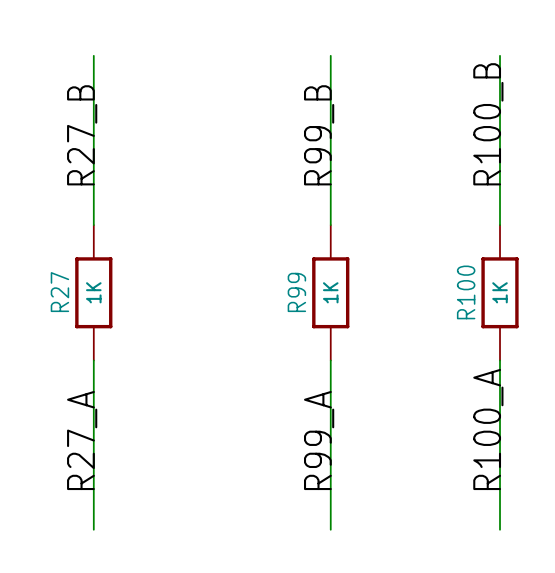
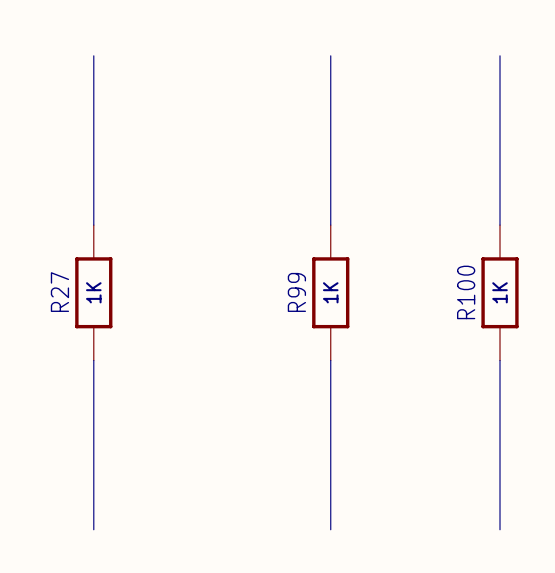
label: R100_B (488, 124) -> none
label: R27_B (82, 135) -> none
label: R99_B (319, 135) -> none
label: R100_A (488, 429) -> none
label: R27_A (82, 440) -> none
label: R99_A (319, 440) -> none

